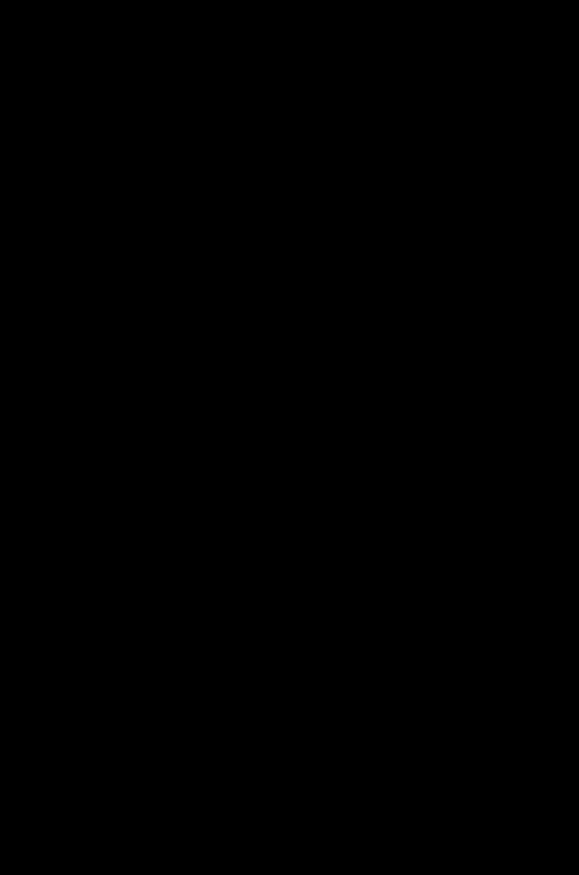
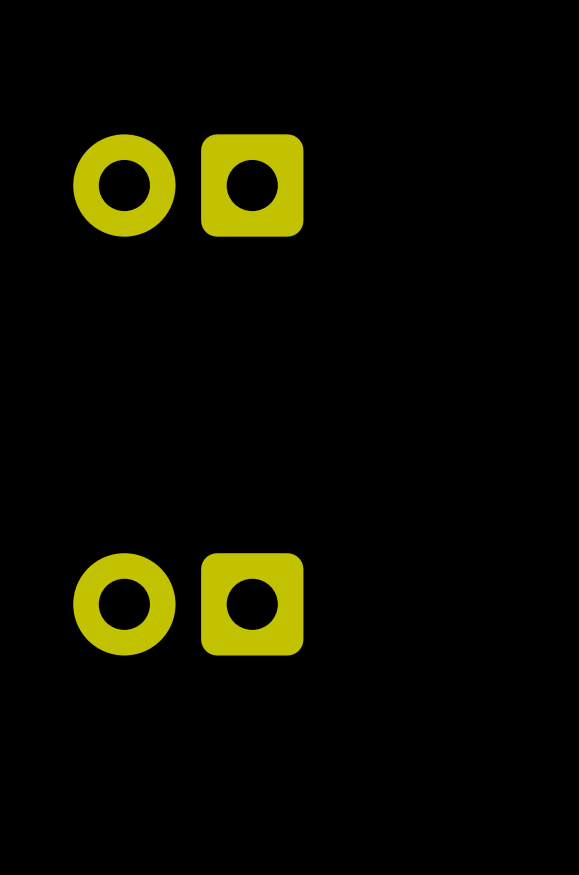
part: none -> (188, 185)
part: none -> (188, 604)

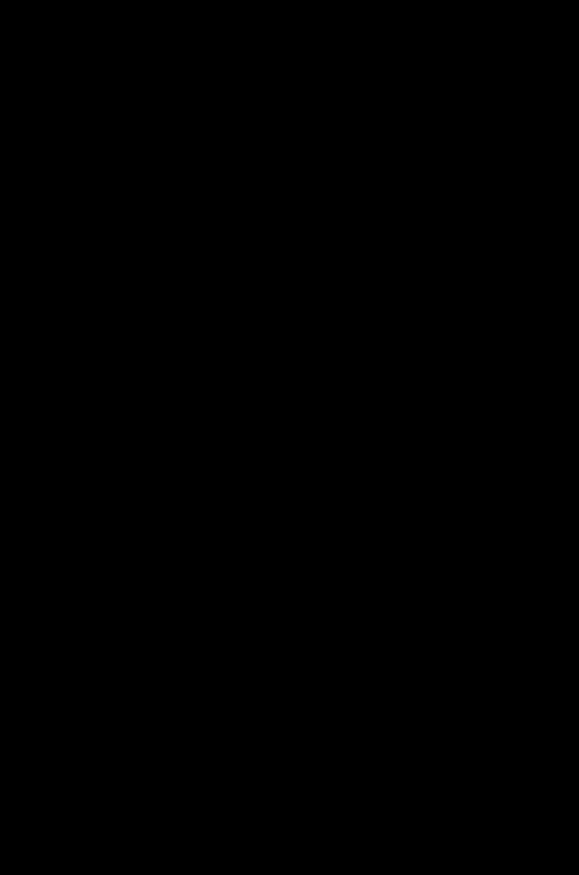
part: (188, 185) -> none
part: (188, 604) -> none

